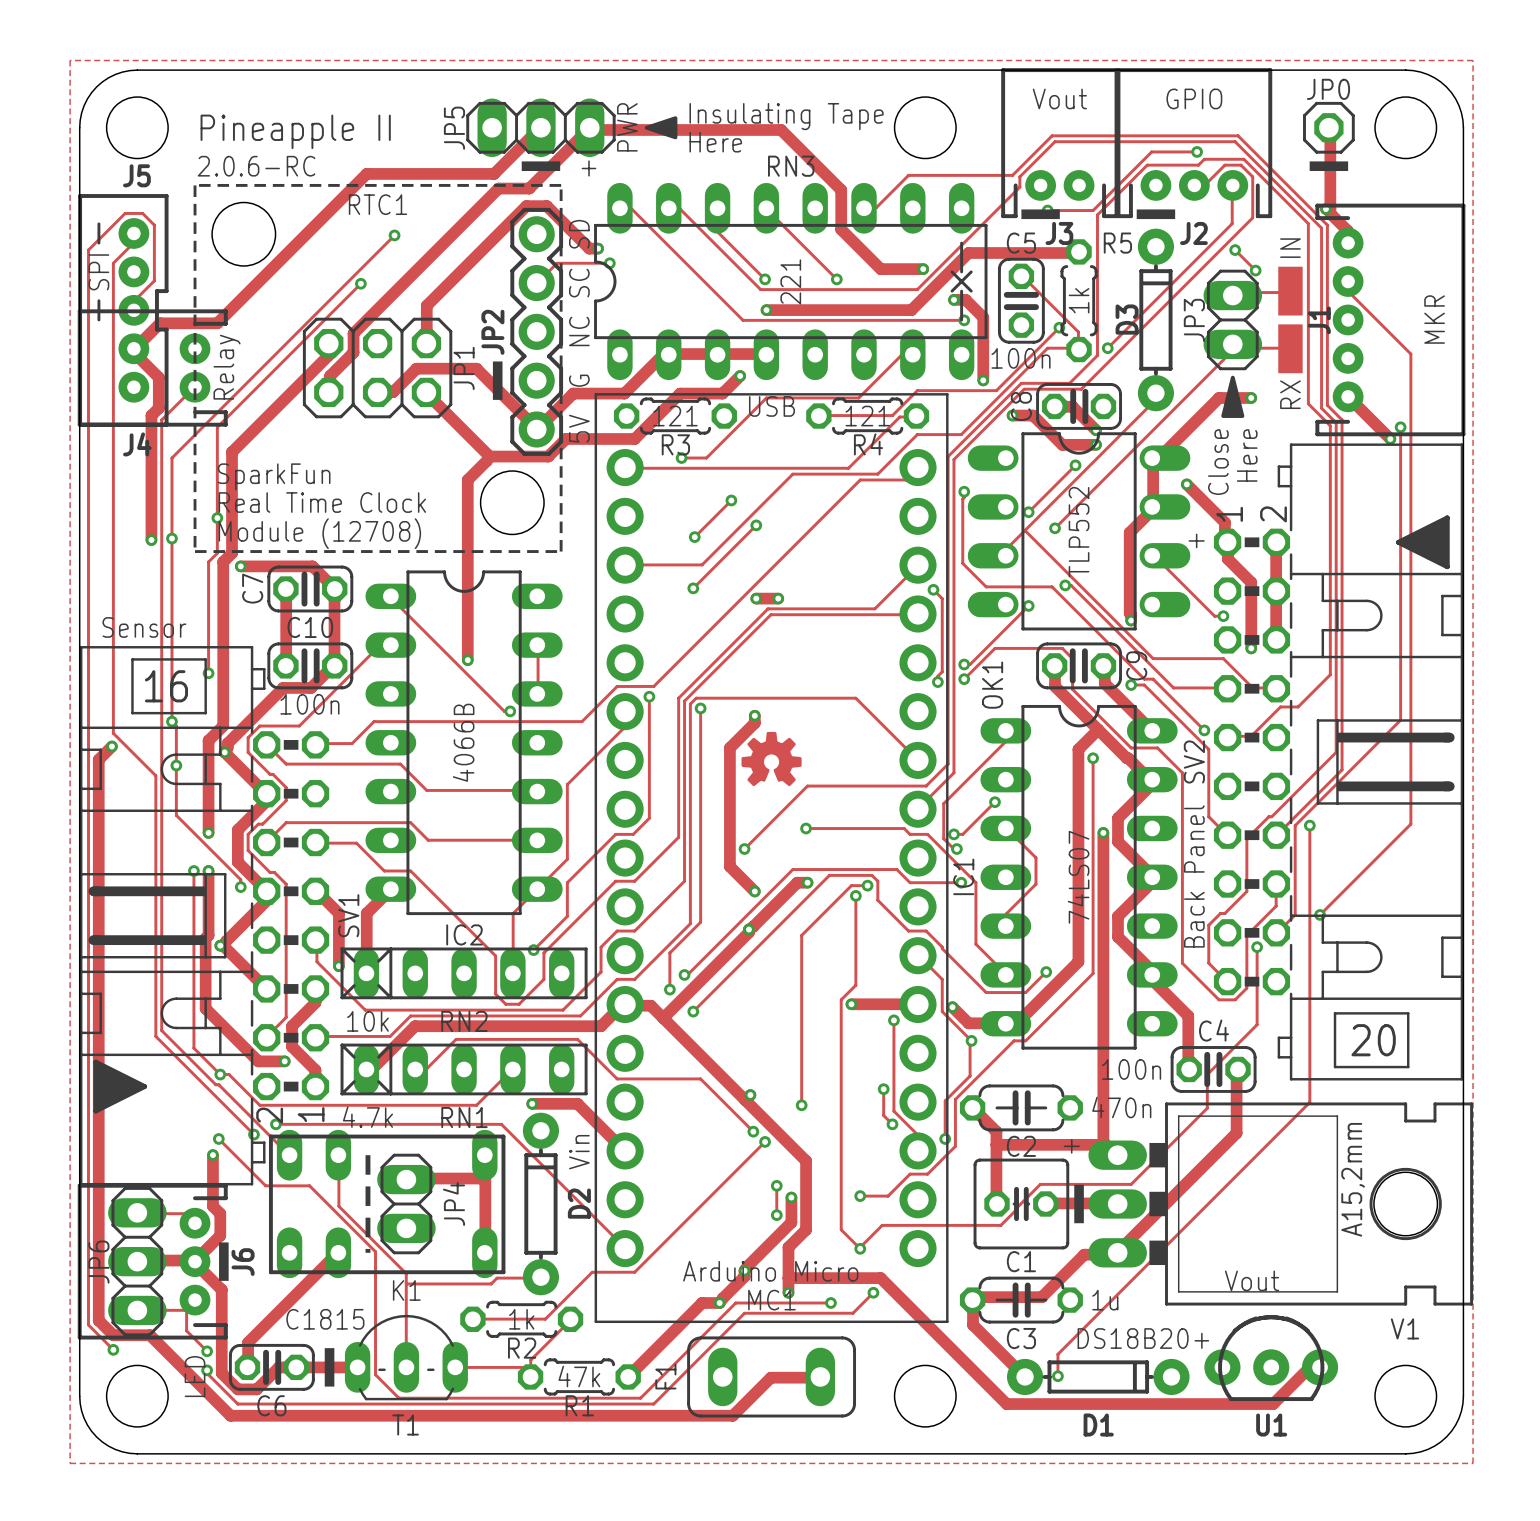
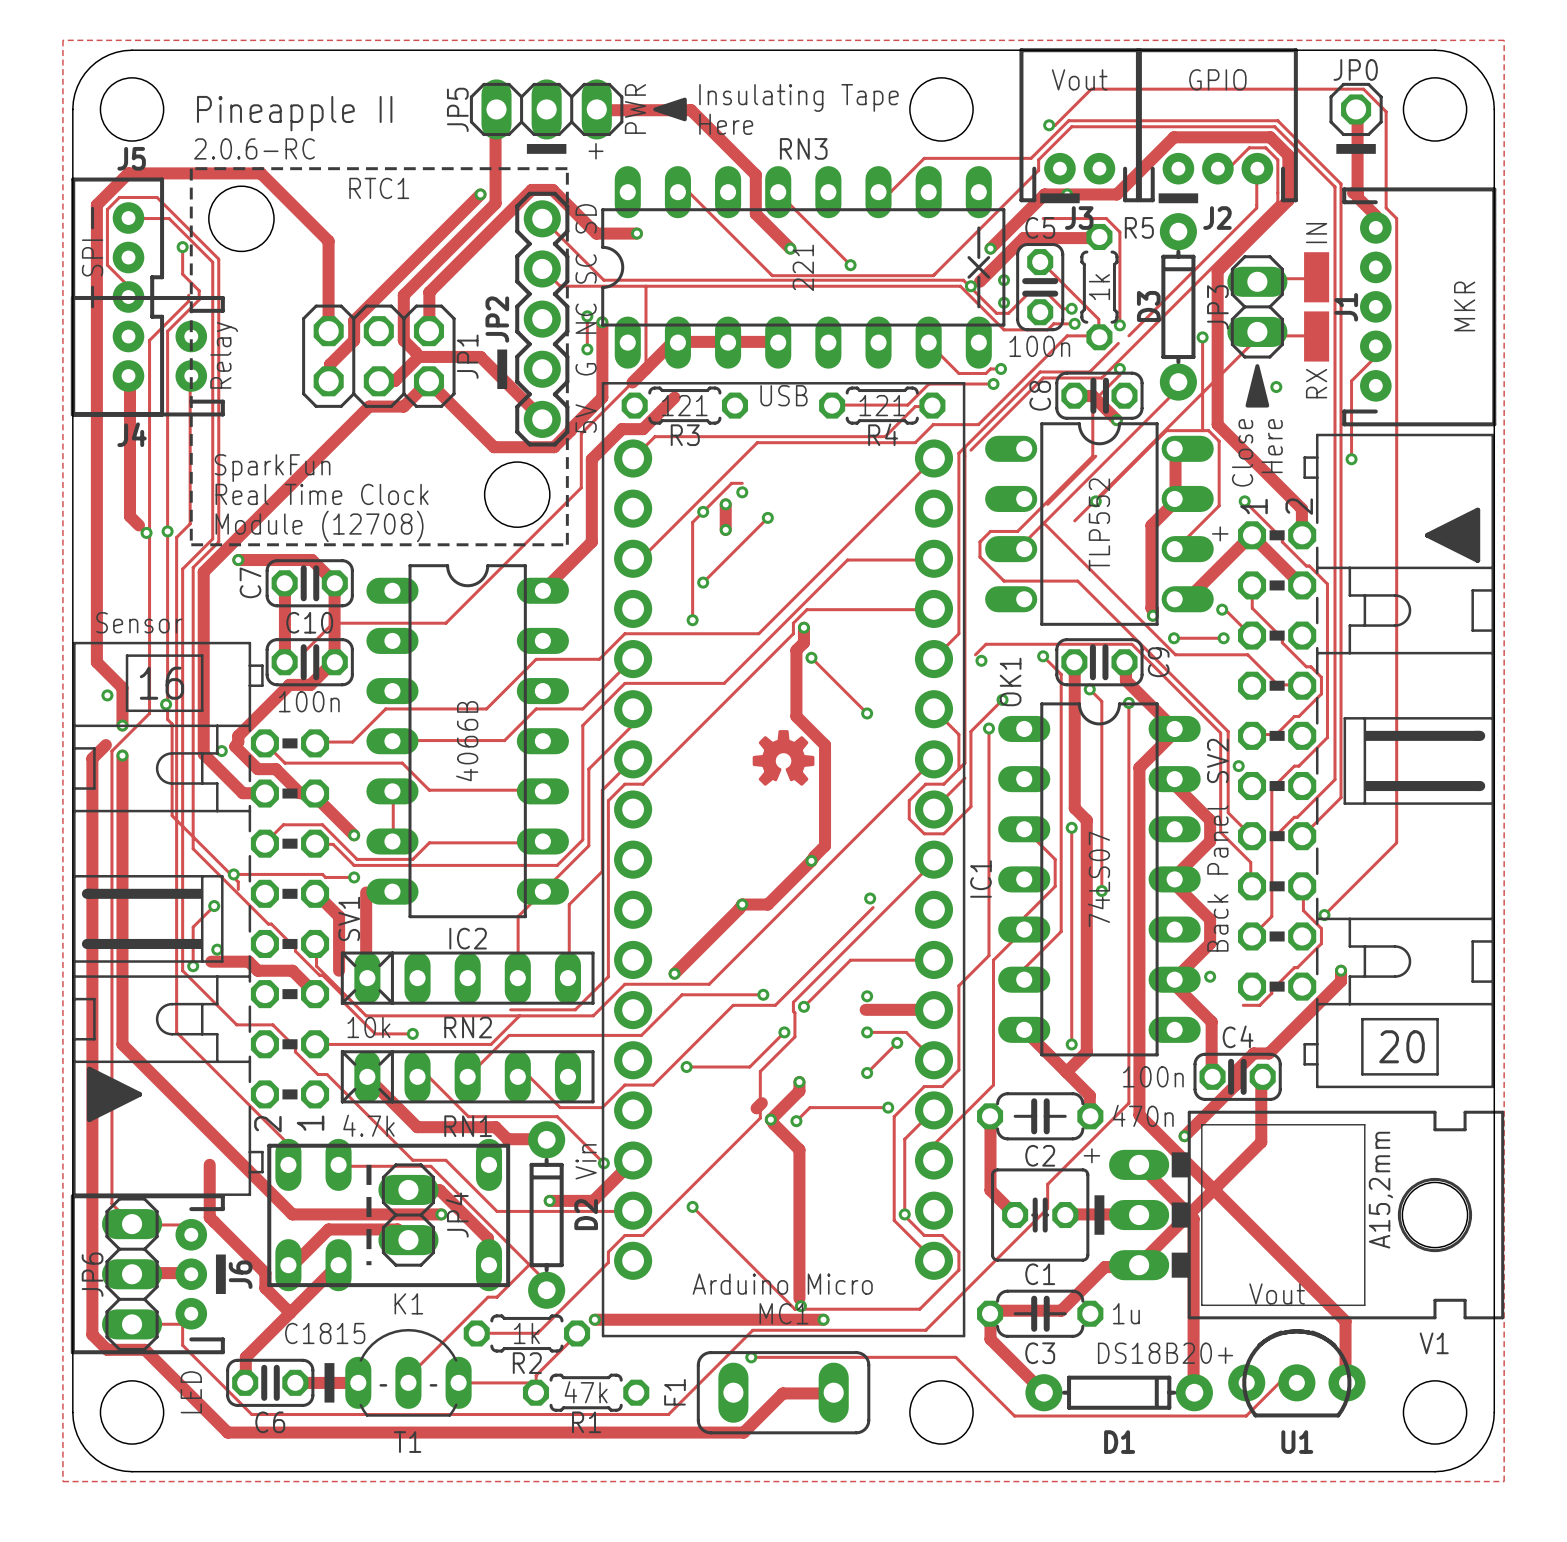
track: none -> (496, 109) (495, 203) (403, 295) (403, 340) (418, 356)
track: (540, 127) (494, 173) (366, 173) (217, 323) (160, 323) (133, 348) (139, 352) (139, 358) (158, 377) (158, 408) (151, 415) (151, 540) -> none
track: none -> (596, 109) (691, 110) (755, 174) (755, 214) (790, 248)
track: (1049, 138) (1052, 135) (1238, 135) (1327, 225) (1327, 405) (1342, 419) (1342, 769) (1314, 797) -> (1068, 120) (1277, 120) (1341, 183) (1341, 797)
track: none -> (1049, 125) (1055, 125) (1091, 89) (1363, 89) (1386, 111) (1386, 208) (1396, 218) (1396, 842) (1324, 915)
via: none -> (1049, 125)
track: (1052, 144) (1055, 141) (1235, 141) (1321, 228) (1321, 408) (1336, 422) (1336, 752) (1308, 780) -> none
track: (1197, 151) (1151, 151) (1093, 210) -> (1302, 535) (1301, 508) (1217, 424) (1217, 271) (1288, 200) (1288, 155) (1270, 137) (1174, 137) (1116, 194) (1113, 194)
via: (1197, 151) -> none
track: (619, 208) (631, 209) (743, 320) (964, 320) -> none
track: (717, 208) (718, 232) (765, 279) -> none
via: (1325, 209) -> none
track: (476, 210) (498, 188) (529, 188) (589, 127) (595, 129) (781, 129) (841, 190) (841, 229) (880, 269) (923, 269) -> none
via: none -> (480, 194)
track: none -> (1067, 194) (1044, 194) (990, 248)
track width: thin (1047, 210) (1093, 210) -> thick (1067, 194) (1113, 194)
track: (142, 213) (154, 225) (154, 280) (135, 299) (133, 310) -> (107, 265) (128, 286) (128, 296)
track: (1308, 223) (1243, 159) (1204, 159) (1198, 165) (1147, 165) (1097, 214) (1097, 355) -> (1334, 208) (1334, 186) (1274, 126) (1071, 126)
track: (113, 225) (88, 250) (88, 1324) (113, 1349) -> none
track: (133, 233) (133, 242) (113, 263) -> (107, 209) (107, 248)
track: none -> (128, 218) (169, 218) (212, 262) (212, 538) (182, 569) (182, 970) (236, 1024) (272, 1024) (295, 1047) (295, 1051) (318, 1074) (327, 1074) (412, 1160) (445, 1160) (497, 1211) (633, 1210)
track: none -> (1043, 218) (1106, 218) (1119, 232) (1119, 325)
track: none -> (542, 218) (603, 280) (963, 280) (996, 313) (1008, 313) (1028, 293) (1047, 293) (1062, 308) (1071, 308)
track: (394, 235) (171, 458) -> (182, 247) (182, 274) (199, 290) (199, 299) (167, 331) (167, 448)
via: (394, 235) -> none
track: none -> (605, 233) (636, 233)
via: (598, 248) -> none
via: none -> (636, 233)
track: (1235, 250) (1255, 270) -> none
via: (1235, 250) -> none
track: (1005, 253) (968, 253) (911, 310) (766, 310) -> (1023, 238) (979, 281)
via: none -> (182, 247)
track: (609, 263) (557, 263) (536, 283) -> (1074, 323) (1053, 323) (1047, 329) (1004, 329) (960, 286) (560, 286) (542, 268)
via: (609, 263) -> none
via: none -> (990, 248)
via: (923, 269) -> none
via: (1255, 270) -> none
track: (113, 279) (113, 733) (155, 775) (155, 1036) (253, 1134) -> none
via position: (765, 279) -> (790, 248)
track: (1348, 281) (1349, 292) (1410, 354) (1410, 824) (1320, 914) -> none
track: (360, 283) (217, 427) (217, 553) -> (137, 197) (157, 197) (218, 259) (218, 541) (214, 546)
via: (360, 283) -> none
via: none -> (1004, 280)
track: none -> (645, 286) (645, 368)
track: (953, 299) (965, 299) (983, 317) (983, 380) -> none
track: none -> (188, 295) (188, 301) (149, 340) (149, 713) (111, 751) (111, 1203) (132, 1224)
via: (766, 310) -> none
via: none -> (1004, 302)
via: (964, 320) -> none
via: none -> (1071, 308)
track: (1059, 327) (996, 390) (917, 390) (912, 395) -> (993, 384) (928, 384)
via: (1059, 327) -> none
track: none -> (587, 316) (587, 349)
via: none -> (587, 316)
via: none -> (602, 322)
via: none -> (1074, 323)
track: (328, 343) (328, 355) (232, 452) (232, 553) -> (428, 381) (403, 406) (369, 406) (229, 546)
track: none -> (328, 331) (328, 241) (260, 173) (128, 173) (96, 204) (96, 662) (122, 687) (122, 725)
via position: (1107, 348) -> (1119, 325)
track: none -> (1202, 337) (1202, 430)
via: none -> (1202, 337)
track: (912, 354) (901, 355) (858, 397) (766, 397) (706, 458) (681, 458) -> (928, 342) (958, 373) (985, 373) (990, 368) (998, 368)
track: none -> (1375, 346) (1375, 356) (1351, 381) (1351, 459)
via: none -> (587, 349)
track: (740, 376) (722, 393) (680, 393) (665, 408) -> none
via: (740, 376) -> none
via: none -> (1119, 368)
track: none -> (128, 375) (129, 516) (139, 525)
track: (193, 387) (161, 419) (161, 1030) (289, 1155) -> (190, 376) (190, 523) (176, 537) (176, 1032) (226, 1082)
track: (624, 393) (573, 393) (536, 429) -> (632, 382) (581, 433) (581, 487) (445, 623) (333, 623) (306, 650)
via: none -> (993, 384)
track: (1348, 396) (1390, 438) -> none
track: (1251, 397) (1219, 397) (1158, 458) (1152, 458) -> none
track: (1308, 403) (1330, 425) (1330, 674) (1298, 706) (1280, 706) (1268, 718) -> (1334, 393) (1334, 779)
track: (1012, 415) (1033, 415) (1062, 444) (1096, 444) -> none
via: (1012, 415) -> none
track: (1400, 427) (1400, 720) (1295, 825) (1295, 914) (1276, 932) -> none
via: (1400, 427) -> none
track: (614, 438) (564, 440) -> (602, 322) (602, 397) (570, 430)
track: none -> (621, 429) (591, 459) (591, 541) (542, 590)
via: (1390, 438) -> none
via: (1096, 444) -> none
track: (870, 446) (848, 468) (625, 467) -> (885, 436) (655, 436) (633, 458)
track: (899, 452) (877, 474) (792, 474) (702, 564) (633, 564) -> (915, 442) (757, 442) (641, 558)
track: (489, 456) (467, 479) (467, 660) -> none
via: (681, 458) -> none
track: (953, 459) (953, 733) -> (1002, 699) (970, 731)
via: (1075, 465) -> none
via: none -> (1351, 459)
track: (905, 479) (860, 479) (653, 686) -> (933, 560) (847, 560) (724, 683) (662, 683)
track: (1186, 484) (1224, 522) (1224, 537) (1227, 542) -> (1174, 599) (1187, 599) (1252, 535)
via position: (1186, 484) -> (1244, 501)
track: none -> (742, 483) (731, 483) (692, 522) (692, 620)
track: (964, 491) (962, 548) -> (1119, 368) (1119, 374) (1092, 402) (1092, 456) (1017, 531) (990, 531) (979, 541)
via: (964, 491) -> none
track: (731, 500) (694, 537) -> none
via: none -> (1095, 501)
track: none -> (1244, 501) (1306, 566) (1309, 566) (1327, 584) (1327, 737) (1298, 766) (1294, 766) (1271, 788) (1271, 839)
track: none -> (725, 504) (725, 529)
via: none -> (725, 504)
via: (1028, 512) -> none
via: (217, 518) -> none
via: none -> (703, 511)
via: (1055, 528) -> none
via: (694, 537) -> none
via: none -> (725, 529)
track: (1227, 542) (1227, 559) (1251, 582) (1251, 648) -> (1252, 535) (1301, 585)
track: (1276, 542) (1276, 639) -> none
track: (1152, 555) (1214, 616) (1223, 616) -> (1174, 549) (1219, 505) (1219, 441) (1208, 430) (1166, 430) (1095, 501)
track: (208, 561) (208, 673) -> (205, 555) (193, 567) (193, 848) (268, 924) (271, 924) (295, 948) (295, 951) (319, 975) (322, 975) (343, 996) (343, 1002) (375, 1033) (412, 1033)
track: (223, 561) (223, 726) (208, 740) (208, 832) -> (220, 555) (203, 572) (203, 754) (242, 793) (263, 793)
track: (917, 566) (874, 608) (767, 608) (678, 698) (678, 837) (634, 881) (615, 881) (543, 953) (543, 979) (519, 1004) -> (575, 1009) (524, 1009)
track: (1065, 585) (1071, 585) (1173, 687) (1227, 688) -> none
via: (1065, 585) -> none
track: (1052, 586) (1144, 679) (1153, 679) (1204, 730) -> (1071, 581) (1077, 581) (1228, 731) (1228, 812) (1232, 817)
track: (933, 589) (942, 598) -> (964, 447) (958, 453) (958, 593)
via: (933, 589) -> none
track: none -> (1252, 585) (1252, 608) (1282, 638) (1282, 642) (1306, 666) (1310, 666) (1321, 677) (1321, 693) (1298, 716) (1294, 716)
track: (390, 596) (504, 711) (510, 711) -> none
track: (756, 598) (778, 598) -> none
via: (756, 598) -> none
via: (778, 598) -> none
track: (1028, 605) (970, 664) (964, 664) -> none
via: (1028, 605) -> none
track: (770, 614) (794, 614) -> (782, 609) (921, 471)
track: none -> (1222, 609) (1225, 609) (1252, 635)
via: none -> (1222, 609)
via: (1223, 616) -> none
via: none -> (692, 620)
track: none -> (803, 627) (803, 642) (796, 650) (796, 716) (825, 745) (825, 845) (767, 904) (742, 904) (674, 973)
via: none -> (803, 627)
track: (747, 638) (684, 701) (684, 881) (634, 931) (617, 931) (601, 947) -> (806, 609) (793, 623) (793, 633) (642, 784) (624, 784) (608, 800) (608, 951)
track: none -> (758, 633) (624, 633) (599, 659) (536, 659) (486, 708) (385, 708) (375, 719)
track: (942, 638) (942, 671) (937, 676) (937, 682) -> (958, 633) (933, 659)
track: none -> (1174, 638) (1223, 638)
via: none -> (1174, 638)
via: none -> (1223, 638)
track: (390, 645) (379, 645) (299, 726) (259, 726) (248, 737) (248, 752) (286, 787) (286, 800) (262, 824) (258, 824) (248, 834) (248, 850) (270, 872) -> (233, 874) (268, 874)
track: (537, 645) (537, 693) -> (392, 791) (392, 841)
track: (994, 648) (964, 679) -> (1013, 644) (985, 644) (975, 654)
track: (1062, 648) (1072, 658) (1072, 689) (1131, 747) (1157, 747) (1182, 772) (1182, 963) (1219, 999) -> (1082, 644) (1131, 644) (1220, 733) (1220, 832) (1250, 862) (1252, 886)
via: (1251, 648) -> none
via: (467, 660) -> none
via: none -> (1043, 656)
track: none -> (811, 657) (867, 713)
via: none -> (811, 657)
track: none -> (633, 659) (582, 708) (536, 708) (504, 740) (392, 741)
via: (208, 673) -> none
via: (964, 679) -> none
via: (937, 682) -> none
track: (1131, 685) (1144, 685) (1208, 749) (1208, 816) -> none
via: (1131, 685) -> none
track: (1055, 686) (1126, 758) (1152, 779) (1151, 784) (1117, 818) -> (1174, 728) (1172, 734) (1139, 767) (1139, 818)
track: none -> (1074, 683) (1074, 808) (1086, 820) (1086, 1051) (1066, 1072)
track: (290, 687) (283, 687) (227, 743) (224, 752) (265, 793) -> (289, 684) (238, 736) (238, 742) (235, 746) (257, 769) (275, 769) (299, 793) (315, 793)
track: none -> (1089, 689) (1101, 701) (1101, 890)
via: none -> (1089, 689)
track: (649, 696) (649, 818) (633, 834) (615, 834) (567, 882) (567, 916) (533, 950) -> none
via: (649, 696) -> none
via: none -> (107, 695)
via: none -> (1002, 699)
via: none -> (1128, 702)
track: (700, 708) (700, 922) (669, 953) (669, 989) -> none
via: (700, 708) -> none
via: (510, 711) -> none
track: none -> (933, 709) (958, 734) (958, 769)
track: (754, 715) (754, 723) (729, 747) (729, 866) (754, 891) -> none
via: (754, 715) -> none
via: none -> (867, 713)
via position: (171, 721) -> (166, 704)
track: (374, 721) (582, 721) -> (333, 844) (354, 865) (557, 865) (582, 839) (582, 725) (588, 719)
via: none -> (122, 725)
track: (1098, 729) (1078, 749) (1078, 961) (1019, 1020) (1011, 1020) (1005, 1023) (968, 1023) (952, 1007) -> none
track: none -> (988, 728) (988, 955) (958, 985)
via: none -> (988, 728)
track: (1005, 730) (1005, 742) (943, 803) (943, 838) (953, 849) (956, 849) -> none
via position: (1204, 730) -> (1238, 766)
via: (111, 746) -> none
track: none -> (122, 755) (122, 1044) (292, 1214) (441, 1214)
via: none -> (122, 755)
track: (1093, 758) (1093, 973) (1025, 1040) (1014, 1040) (955, 1099) (955, 1146) (927, 1174) (910, 1174) (888, 1196) (860, 1196) -> none
via: (1093, 758) -> none
track: none -> (633, 759) (602, 790) (602, 871) (569, 904) (567, 978)
track: (918, 760) (855, 698) (696, 698) (690, 704) (690, 923) (634, 979) -> (933, 759) (709, 984) (642, 984)
via: (176, 765) -> none
track: (582, 769) (567, 784) (567, 859) -> (588, 769) (588, 845) (573, 860)
track: (953, 772) (948, 778) -> (970, 772) (970, 806) (943, 833) (924, 833)
track: (927, 784) (807, 786) (744, 849) -> none
track: (266, 793) (265, 802) (237, 829) (237, 862) (266, 891) (265, 901) (223, 945) -> none
track: none -> (315, 793) (318, 799) (354, 835)
track: (994, 802) (962, 834) (953, 834) -> none
via: (994, 802) -> none
track: (284, 824) (410, 822) (428, 840) (537, 840) -> (283, 824) (322, 824) (357, 859) (412, 859) (429, 842) (542, 841)
track: (1309, 825) (1309, 1102) (1057, 1354) (1057, 1376) -> none
via: (1309, 825) -> none
track: none -> (1071, 827) (1071, 1044)
via: none -> (1071, 827)
track: (806, 828) (904, 828) -> (943, 784) (925, 784) (909, 800) (909, 818) (919, 829)
via: (806, 828) -> none
via: (208, 832) -> none
track: (908, 832) (927, 834) (975, 882) (975, 944) (1005, 974) -> (1043, 656) (1061, 674) (1061, 931) (1025, 967) (1024, 979)
track: (1103, 832) (1103, 1141) (1117, 1155) (1098, 1144) (996, 1144) -> none
via: (1103, 832) -> none
via: none -> (354, 835)
via: (953, 834) -> none
track: (1117, 841) (1152, 877) (1151, 882) (1117, 916) -> (1139, 842) (1139, 919)
track: (333, 843) (356, 843) (384, 870) (410, 870) (495, 955) (495, 994) (505, 1004) -> none
via: (744, 849) -> none
via: (956, 849) -> none
via: none -> (811, 860)
track: (193, 870) (193, 1048) (220, 1074) (229, 1074) -> none
via: (193, 870) -> none
track: (208, 870) (205, 1008) (258, 1061) (284, 1061) -> none
via: (208, 870) -> none
via: none -> (233, 874)
track: (274, 872) (286, 884) (286, 1017) (266, 1037) -> (272, 874) (322, 874) (325, 877) (354, 877)
via: none -> (354, 877)
track: (807, 882) (797, 882) (663, 1018) -> none
via: (807, 882) -> none
track: (961, 882) (910, 882) (896, 869) (792, 869) (687, 974) (684, 974) -> none
via: (961, 882) -> none
track: (1276, 884) (1276, 906) (1246, 935) (1246, 985) -> (1302, 886) (1303, 910) (1321, 928) (1321, 943) (1271, 990)
track: (867, 885) (851, 885) (801, 935) (801, 1105) -> none
via: (867, 885) -> none
via: (240, 887) -> none
via: none -> (1101, 890)
track: (390, 890) (366, 913) (366, 973) -> (366, 892) (367, 978)
via: (754, 891) -> none
track: (1246, 891) (1224, 913) (1220, 913) (1208, 925) (1208, 963) (1227, 981) -> (1271, 894) (1271, 916) (1252, 936)
track: (855, 895) (855, 985) (841, 999) (841, 1229) (860, 1248) (882, 1225) (1000, 1225) -> none
via: none -> (742, 904)
track: none -> (214, 906) (193, 927) (193, 966)
via: none -> (214, 906)
track: none -> (873, 907) (775, 1005) (733, 1005) (653, 1085) (624, 1085) (602, 1107) (560, 1107) (530, 1077) (517, 1076)
via position: (1320, 914) -> (1324, 915)
via: (748, 929) -> none
track: (1117, 936) (1150, 969) (1152, 974) -> (1174, 779) (1175, 785) (1210, 820) (1210, 841) (1177, 874) (1174, 879) (1175, 884) (1210, 919) (1210, 943) (1174, 979)
track: (223, 945) (266, 988) -> none
track: (1257, 947) (1257, 1024) (1207, 1074) (1207, 1108) (1131, 1184) (1040, 1184) (1015, 1210) -> (1128, 702) (1128, 1103) (1047, 1184) (1047, 1208) (1034, 1221)
via: (1257, 947) -> none
via: (533, 950) -> none
track: (918, 955) (942, 980) -> (933, 959) (850, 960) (803, 1006)
via: none -> (193, 966)
via: (338, 966) -> none
track: none -> (1341, 970) (1341, 981) (1268, 1053) (1253, 1053) (1235, 1071) (1235, 1085) (1184, 1136)
via: none -> (1341, 970)
via: none -> (674, 973)
track: (1046, 972) (1025, 992) (986, 992) (926, 931) (908, 931) (877, 900) (877, 881) (871, 875) (829, 875) (693, 1011) -> none
via: (1046, 972) -> none
via: none -> (1210, 976)
via: (684, 974) -> none
track: (315, 988) (315, 1002) (292, 1026) (292, 1046) (315, 1070) (315, 1086) -> (315, 994) (292, 970) (257, 970) (248, 961) (211, 961)
via: (669, 989) -> none
track: none -> (763, 994) (682, 994) (641, 1035) (509, 1035) (467, 1076)
via: none -> (763, 994)
via: none -> (867, 996)
via: none -> (803, 1006)
track: (568, 1004) (562, 1010) -> (593, 1015) (569, 1015)
via: (851, 1004) -> none
via: (952, 1007) -> none
track: (586, 1010) (580, 1015) (410, 1015) (390, 1036) (315, 1037) -> (519, 1015) (491, 1044) (315, 1044)
via: (693, 1011) -> none
track: (942, 1011) (971, 1040) (970, 1076) (945, 1100) (945, 1138) -> (958, 1017) (958, 1070) (942, 1086) (924, 1086) (894, 1116) (894, 1220) (933, 1260)
track: (893, 1020) (893, 1111) (917, 1134) (918, 1150) -> (1024, 929) (993, 960) (993, 1085) (934, 1143) (933, 1160)
via position: (893, 1020) -> (897, 1042)
track: none -> (1024, 1029) (1089, 1095) (1090, 1116)
track: none -> (784, 1032) (749, 1067) (686, 1067)
via: none -> (784, 1032)
track: none -> (867, 1032) (906, 1032) (933, 1060)
via: none -> (867, 1032)
via: none -> (412, 1033)
track: none -> (897, 1042) (867, 1073)
via: none -> (1071, 1044)
via: (971, 1040) -> none
via: none -> (686, 1067)
via: (284, 1061) -> none
via: none -> (867, 1073)
track: (366, 1069) (372, 1068) (415, 1026) (601, 1026) (625, 1004) (650, 1005) (806, 1160) (806, 1229) (788, 1247) (788, 1292) -> (367, 1076) (417, 1127) (495, 1127) (507, 1139) (546, 1139)
track: (415, 1069) (426, 1068) (456, 1039) (577, 1039) (617, 1078) (700, 1078) (753, 1131) -> (417, 1076) (429, 1077) (468, 1116) (557, 1116) (603, 1163)
track: (512, 1069) (476, 1105) (259, 1105) -> (287, 1164) (287, 1143) (257, 1113)
via: (220, 1074) -> none
track: none -> (799, 1082) (799, 1091) (770, 1119) (799, 1149) (799, 1298)
via: none -> (799, 1082)
track: (883, 1089) (883, 1115) (892, 1124) -> none
via position: (883, 1089) -> (888, 1107)
via: (750, 1095) -> none
track: none -> (888, 1107) (809, 1107) (796, 1121)
track: none -> (933, 1110) (904, 1139) (904, 1215) (924, 1235) (942, 1235) (958, 1252) (958, 1270) (919, 1309) (794, 1309) (692, 1206)
track: (532, 1103) (577, 1103) (625, 1150) -> (549, 1200) (593, 1200) (633, 1160)
via: (532, 1103) -> none
via: (801, 1105) -> none
track: (973, 1108) (996, 1131) (996, 1203) -> (990, 1116) (990, 1190) (1014, 1214)
via: none -> (770, 1119)
via: none -> (796, 1121)
track: (275, 1124) (501, 1124) (625, 1248) -> none
via: (275, 1124) -> none
via: (892, 1124) -> none
via: none -> (1184, 1136)
via: (753, 1131) -> none
via: (253, 1134) -> none
track: (218, 1138) (265, 1185) (309, 1185) (375, 1251) (375, 1374) (398, 1398) -> (203, 1366) (251, 1414) (400, 1414)
via: (218, 1138) -> none
via: (945, 1138) -> none
track: (765, 1141) (634, 1272) (592, 1272) (545, 1319) (532, 1319) -> (933, 859) (793, 1002) (794, 1036) (760, 1071) (760, 1118) (642, 1235) (624, 1235) (608, 1252) (608, 1262) (537, 1333)
via: (765, 1141) -> none
via: none -> (603, 1163)
via: (212, 1155) -> none
track: none -> (1139, 1164) (1193, 1218) (1194, 1392)
track: (338, 1156) (338, 1206) (406, 1273) (406, 1367) -> (339, 1166) (430, 1166) (545, 1280) (546, 1290)
track: (406, 1179) (480, 1178) (484, 1155) (484, 1252) -> (408, 1189) (439, 1190) (488, 1238) (488, 1265)
track: (776, 1185) (776, 1215) -> none
via: (776, 1185) -> none
via: none -> (549, 1200)
via: none -> (692, 1206)
via: (860, 1196) -> none
track: (791, 1197) (791, 1222) (747, 1266) (744, 1270) (744, 1276) (719, 1303) (702, 1303) (628, 1376) -> none
via: (791, 1197) -> none
via: none -> (441, 1214)
via: none -> (904, 1214)
track: (220, 1213) (220, 1235) (195, 1261) (221, 1289) (221, 1373) (237, 1389) (256, 1389) (278, 1367) (296, 1367) -> (217, 1224) (265, 1273) (265, 1288) (290, 1312)
via: (776, 1215) -> none
track: none -> (408, 1240) (397, 1229) (328, 1229) (293, 1264) (288, 1265)
via: (860, 1248) -> none
via: (744, 1270) -> none
track: (540, 1277) (497, 1278) (491, 1283) -> (529, 1264) (495, 1297)
track: (788, 1278) (880, 1278) (1006, 1404) (1273, 1404) (1309, 1367) (1320, 1367) -> (1139, 940) (1139, 1115) (1345, 1321) (1347, 1382)
track: (406, 1283) (483, 1283) -> (408, 1382) (409, 1375) (488, 1297)
track: (873, 1292) (852, 1313) (744, 1313) (741, 1316) -> (1019, 1236) (925, 1330) (752, 1330)
via: (873, 1292) -> none
via: (719, 1303) -> none
track: (830, 1303) (735, 1303) (640, 1398) -> (668, 1414) (649, 1414)
via position: (830, 1303) -> (823, 1319)
track: none -> (594, 1319) (823, 1319)
via: none -> (594, 1319)
track: none -> (751, 1357) (955, 1357) (1014, 1416) (1246, 1416) (1279, 1382) (1296, 1382)
via: none -> (751, 1357)
via: (113, 1349) -> none
via: (207, 1351) -> none
track: (207, 1370) (207, 1373) (237, 1404) (653, 1404) (659, 1398) -> none
via: (207, 1370) -> none
via: (1057, 1376) -> none

